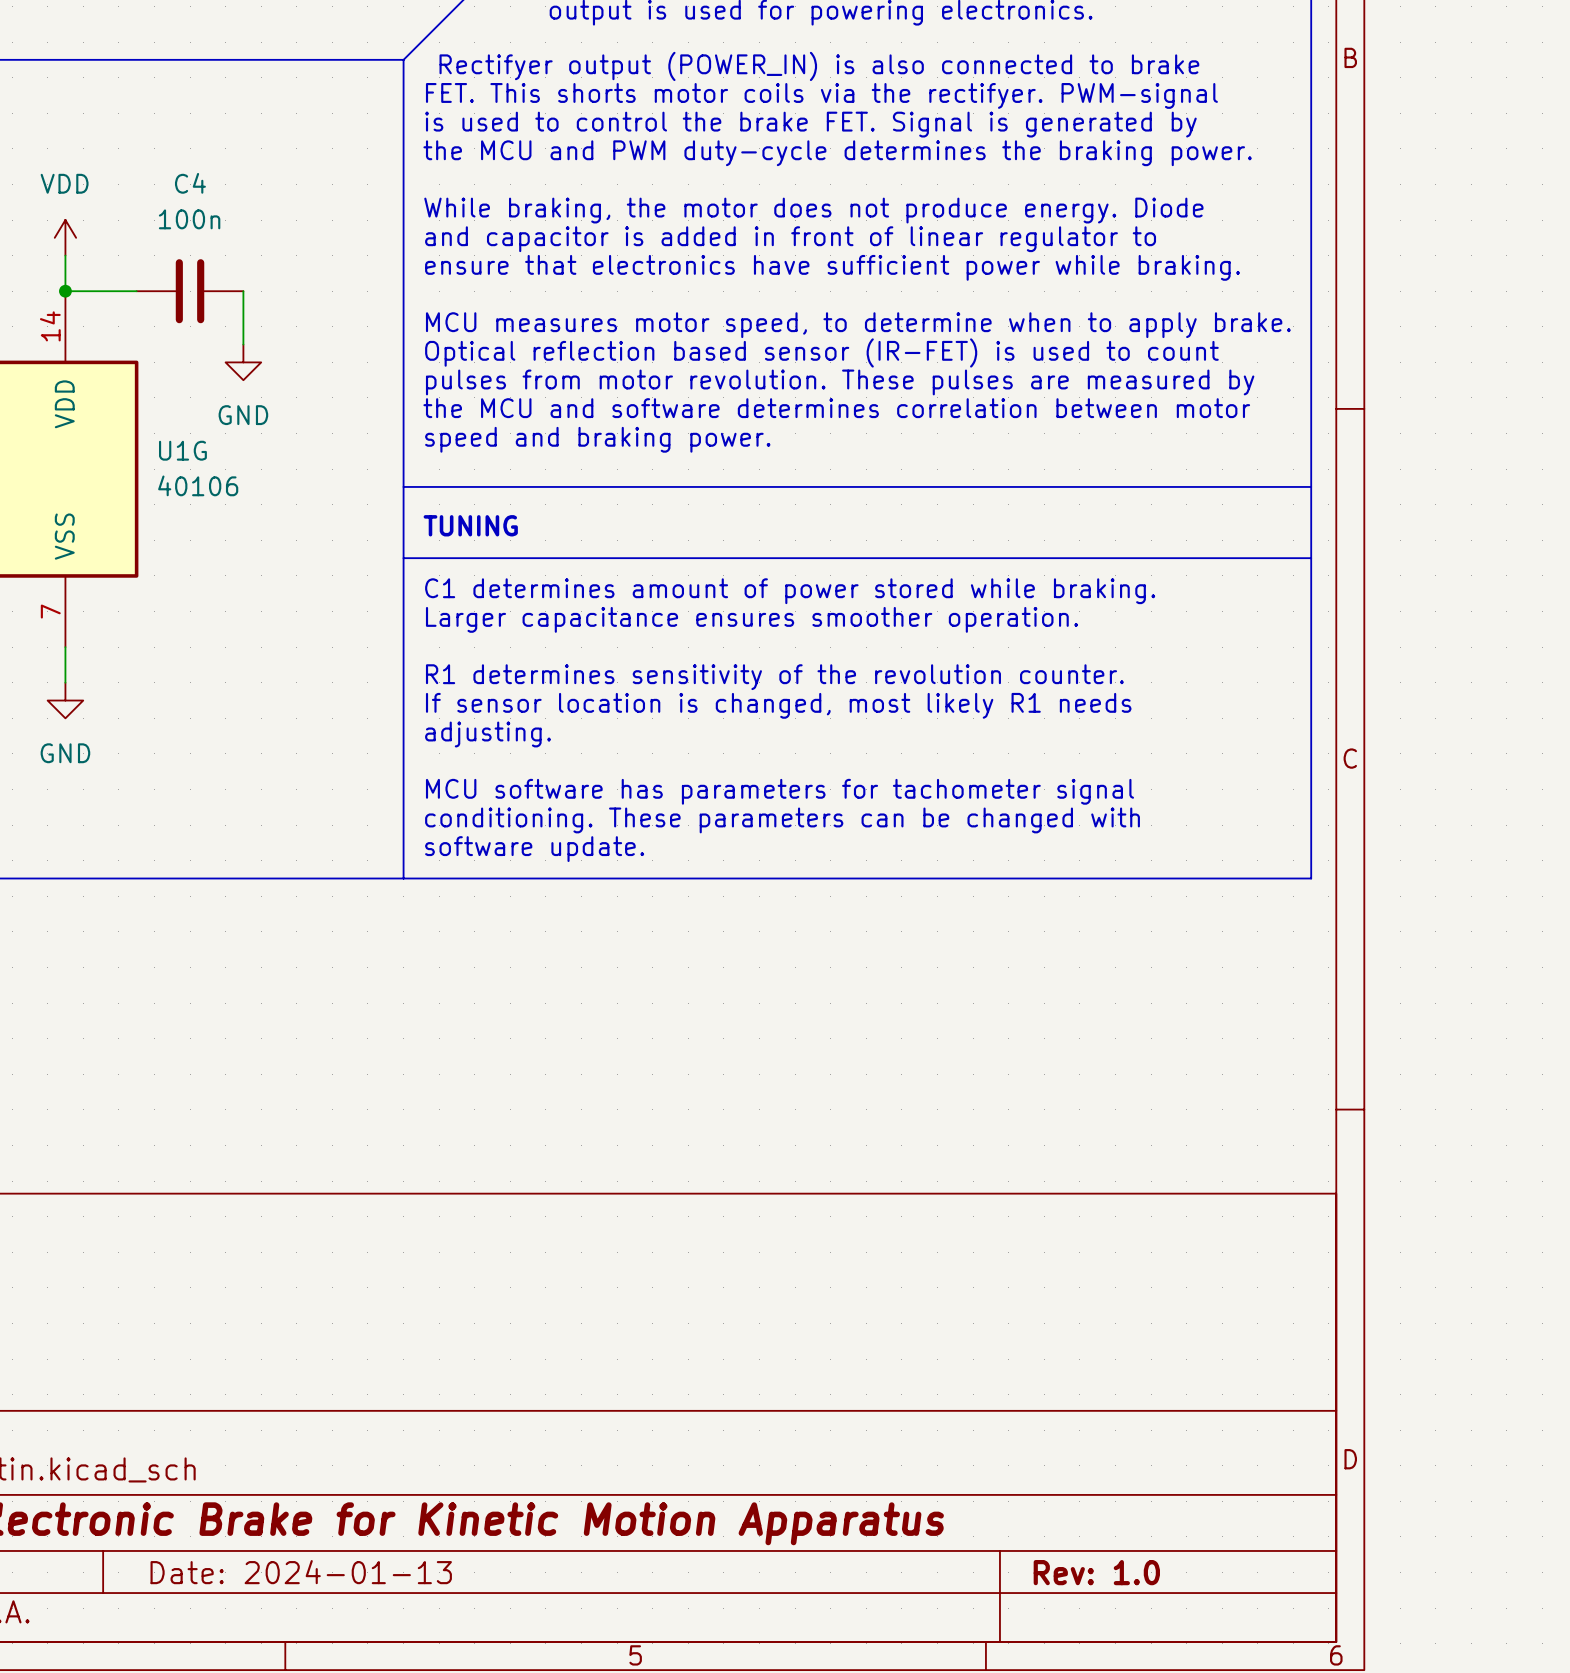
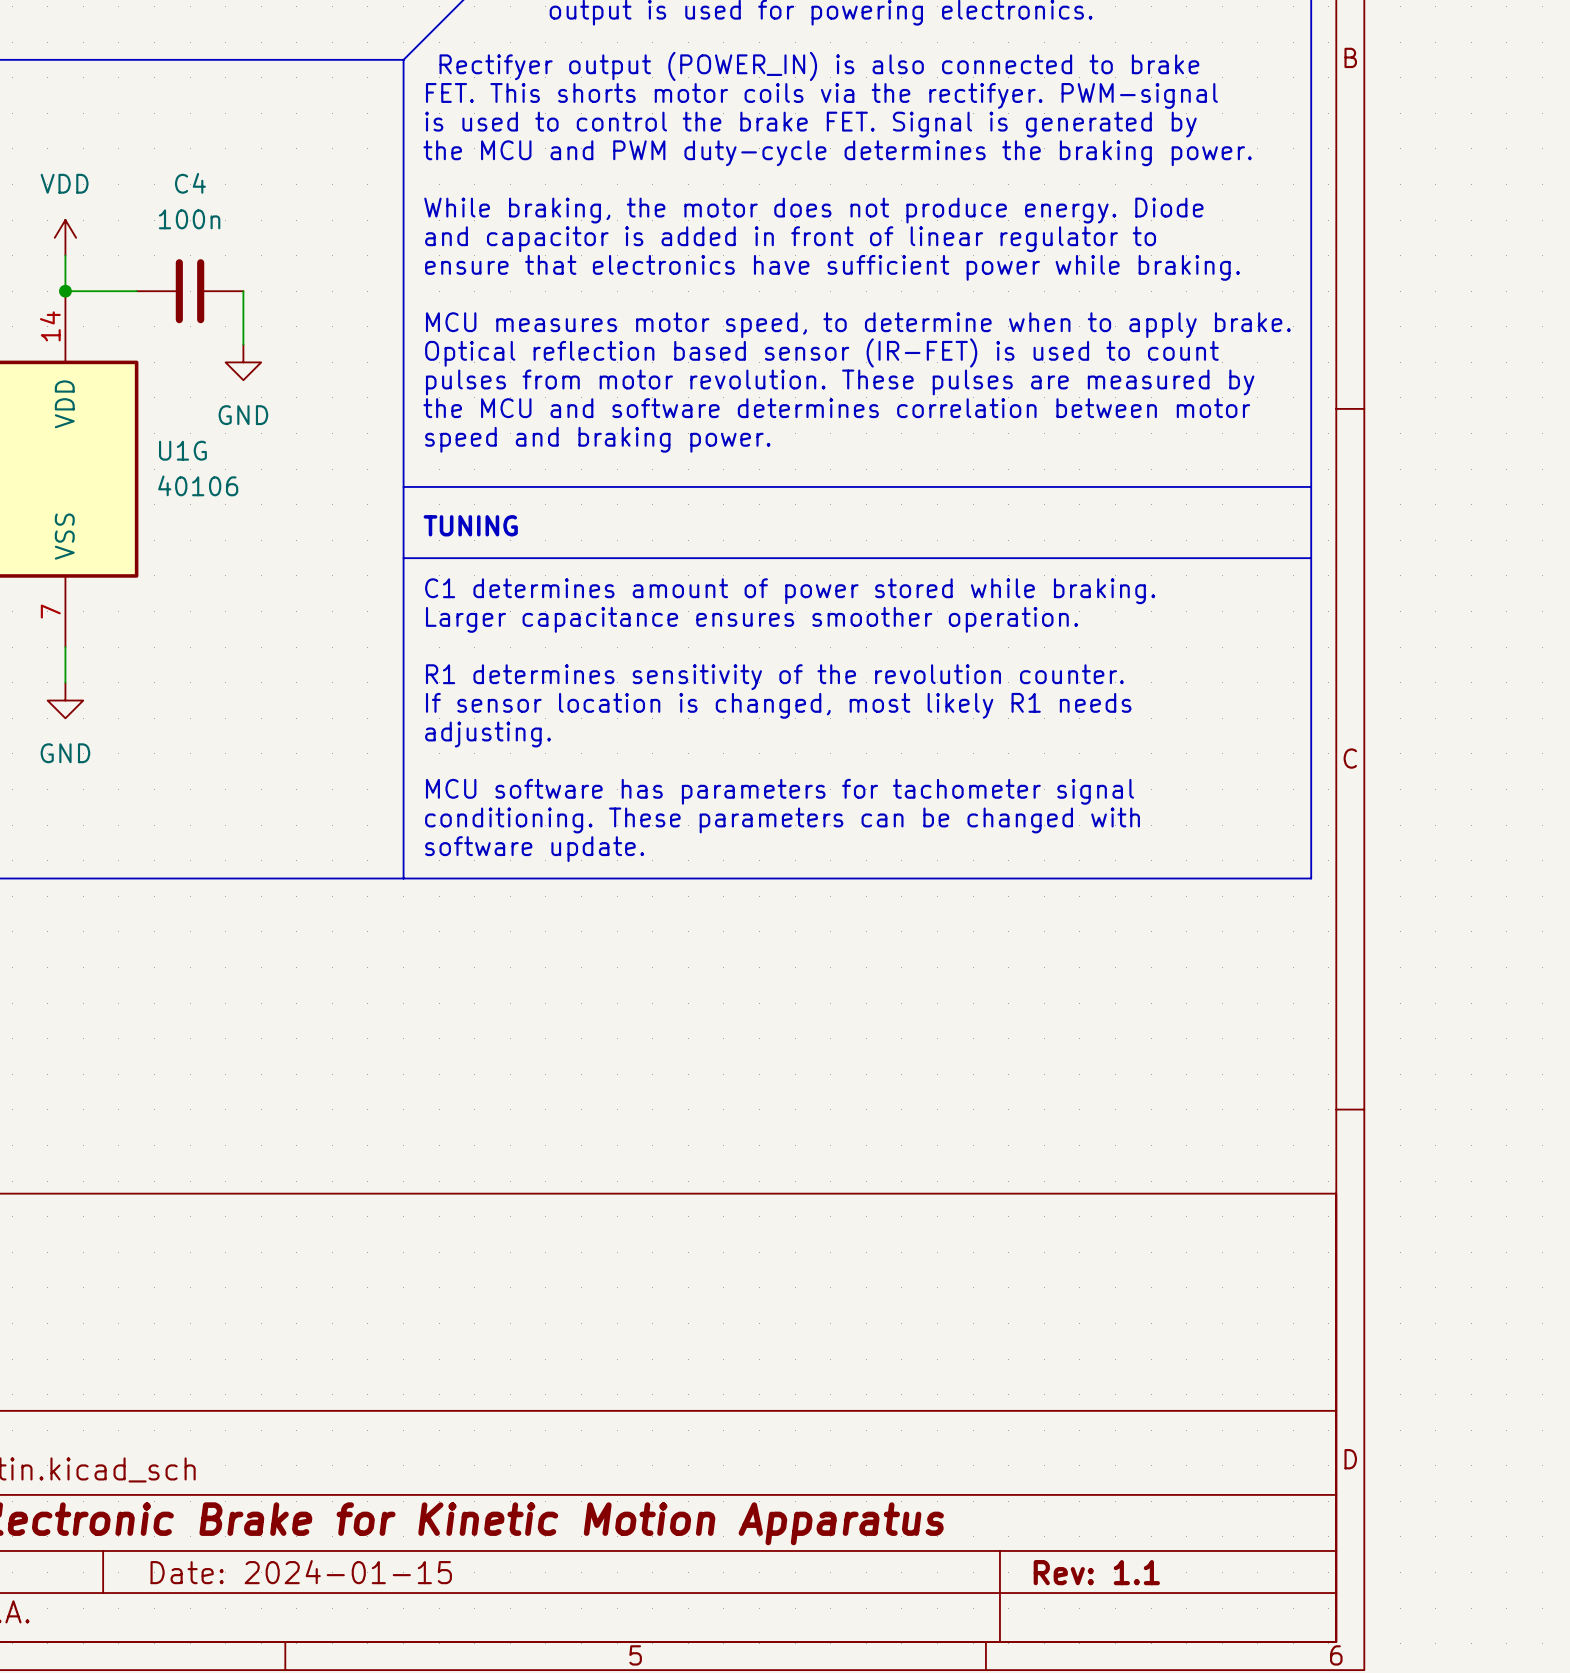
title block: Date: 2024-01-13 (301, 1572) -> Date: 2024-01-15 (301, 1572)
title block: Rev: 1.0 (1096, 1572) -> Rev: 1.1 (1096, 1572)

